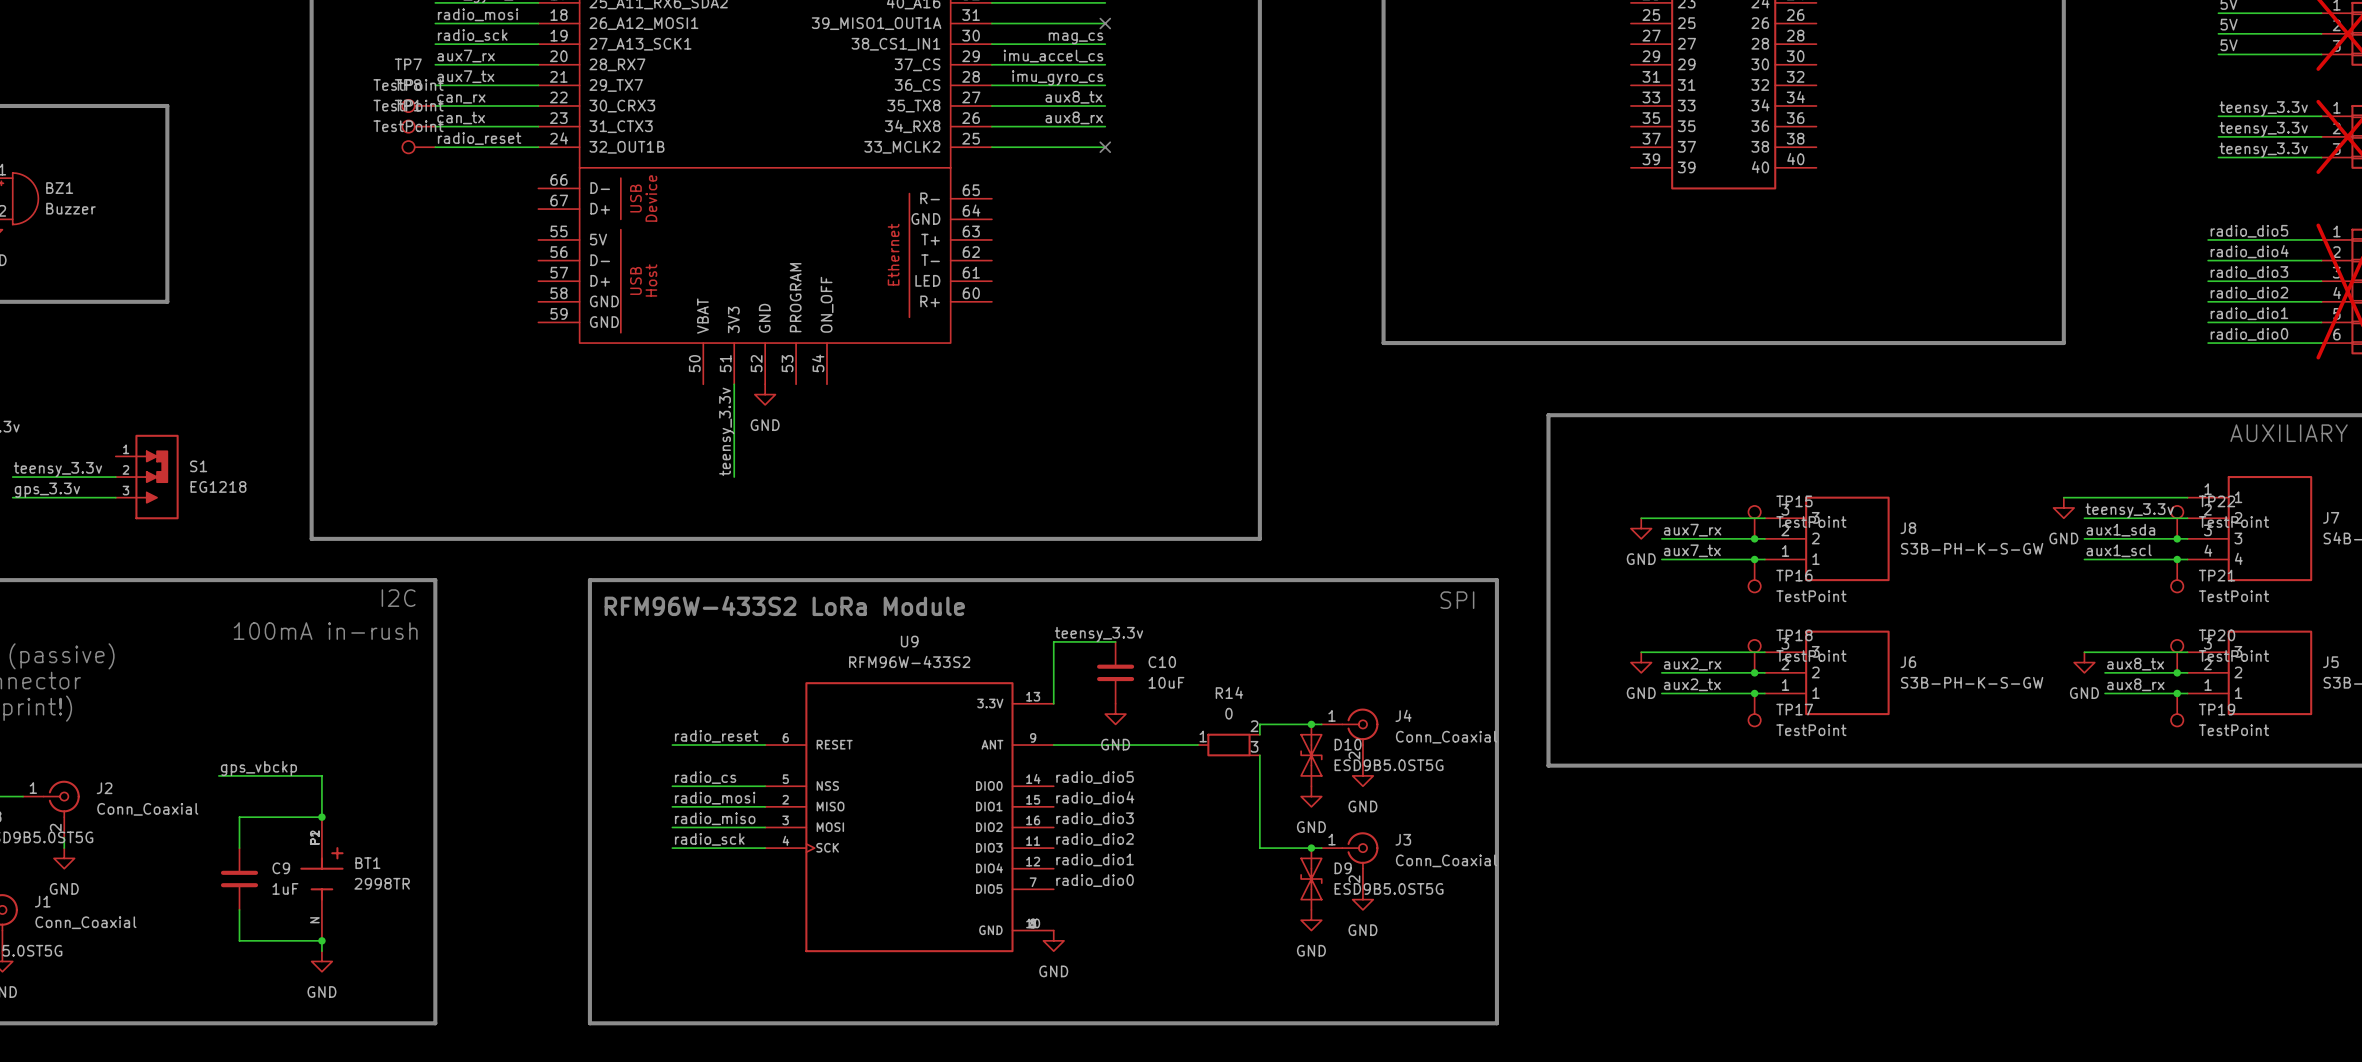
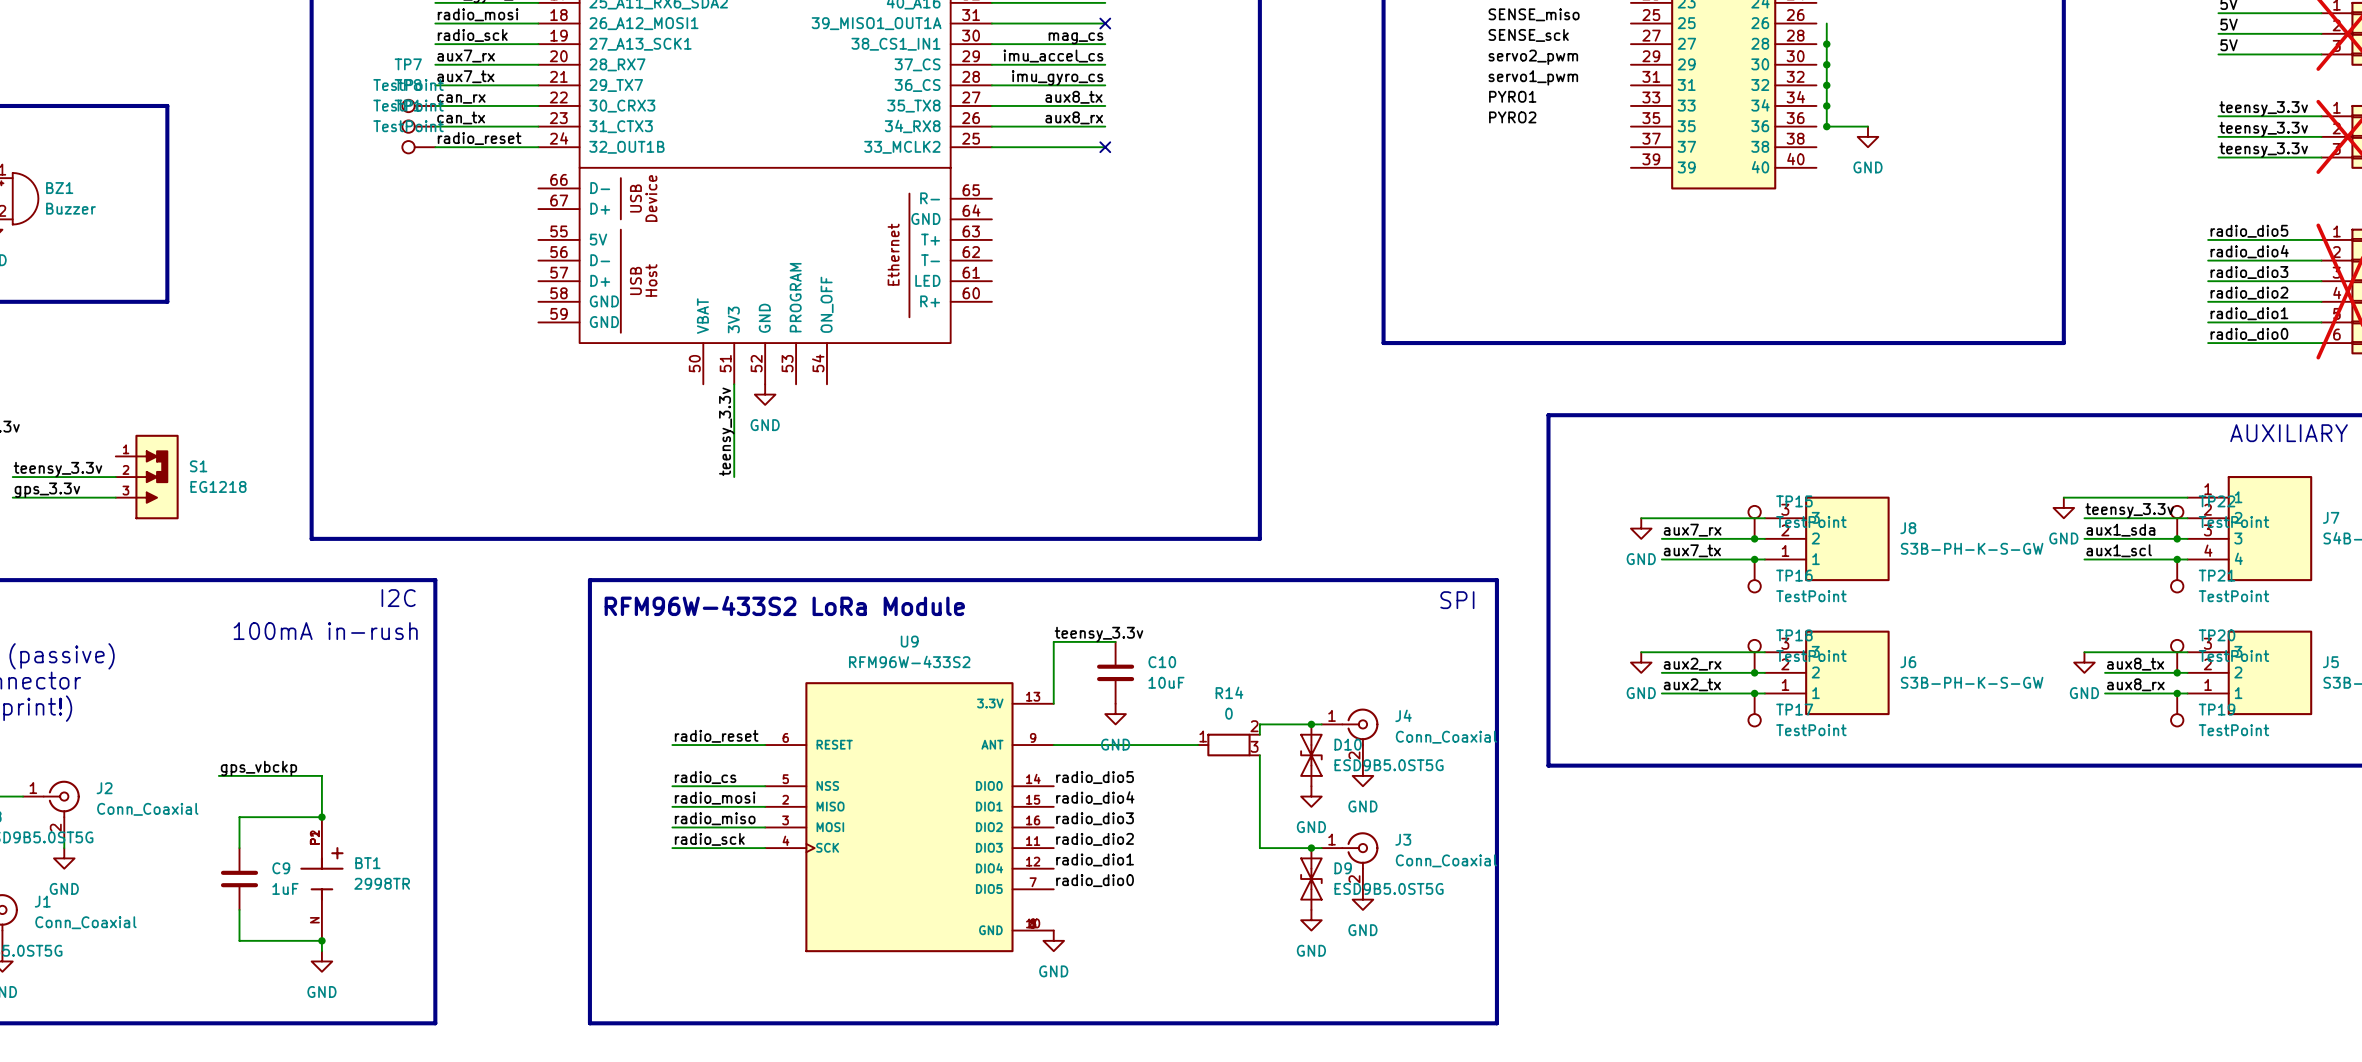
label: none -> SENSE_miso (1534, 14)
wire: none -> (1826, 23) (1826, 126) (1868, 126)
label: none -> SENSE_sck (1528, 35)
junction: none -> (1826, 44)
label: none -> servo2_pwm (1533, 57)
junction: none -> (1826, 64)
label: none -> servo1_pwm (1533, 77)
junction: none -> (1826, 85)
label: none -> PYRO1 (1512, 96)
junction: none -> (1826, 105)
label: none -> PYRO2 (1512, 117)
junction: none -> (1826, 126)
power symbol: none -> GND (1868, 136)

